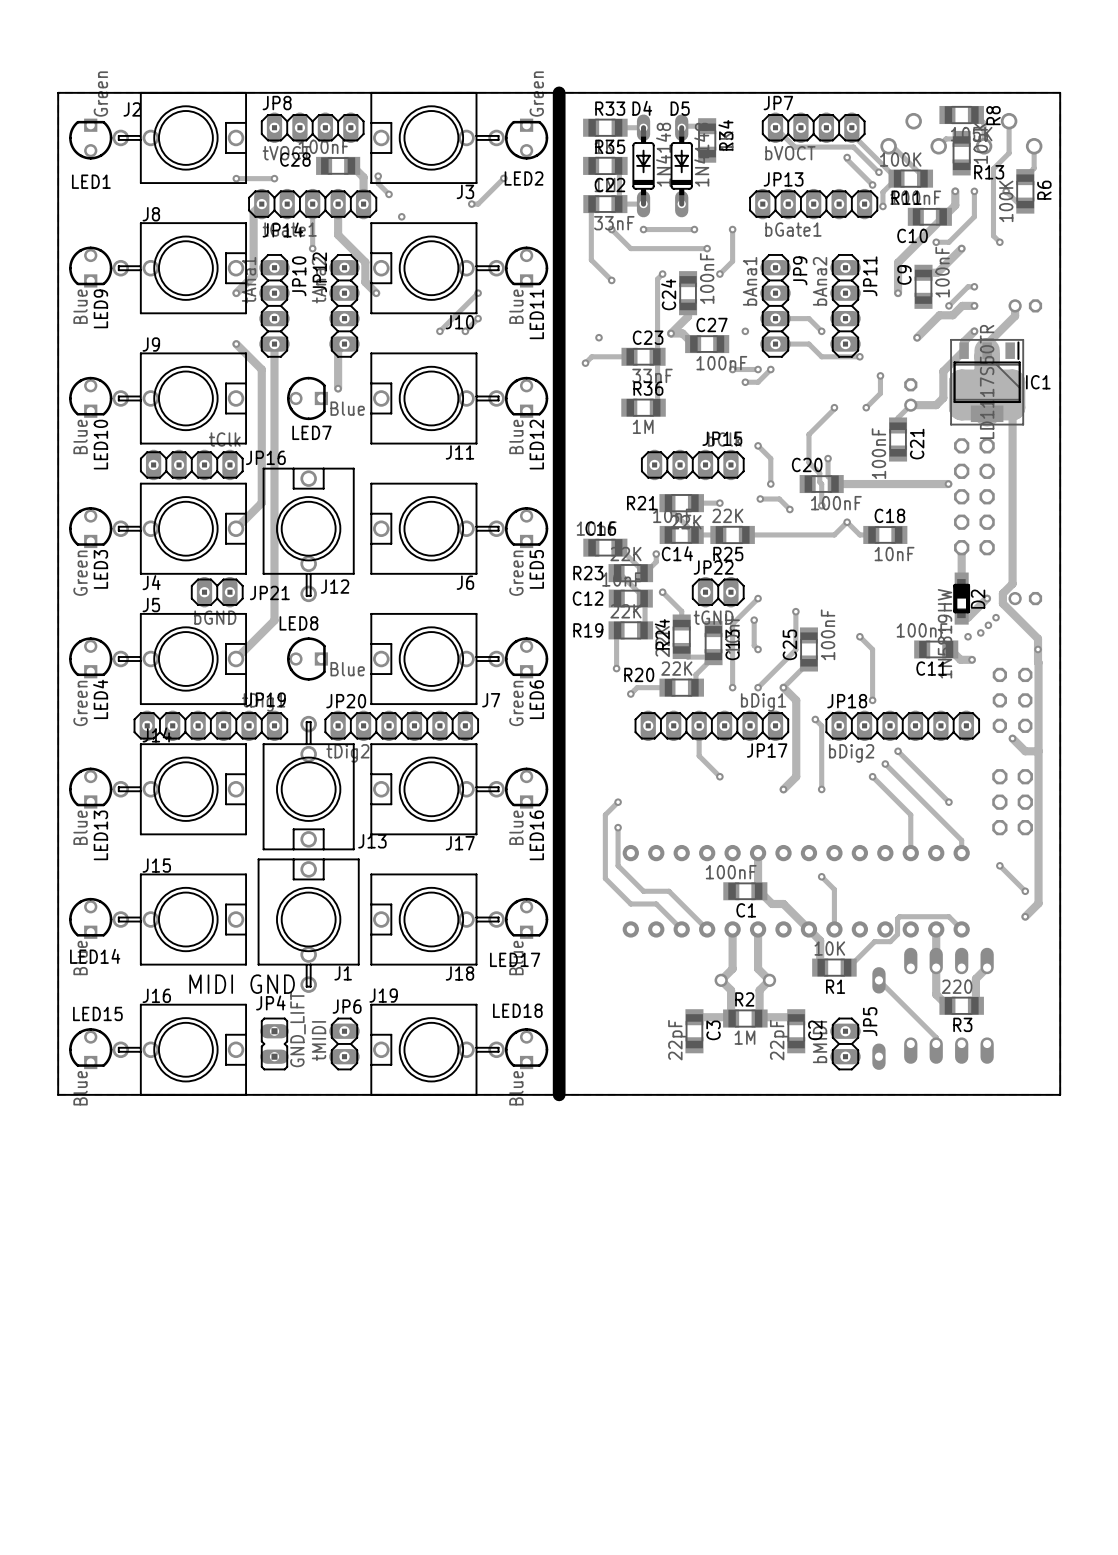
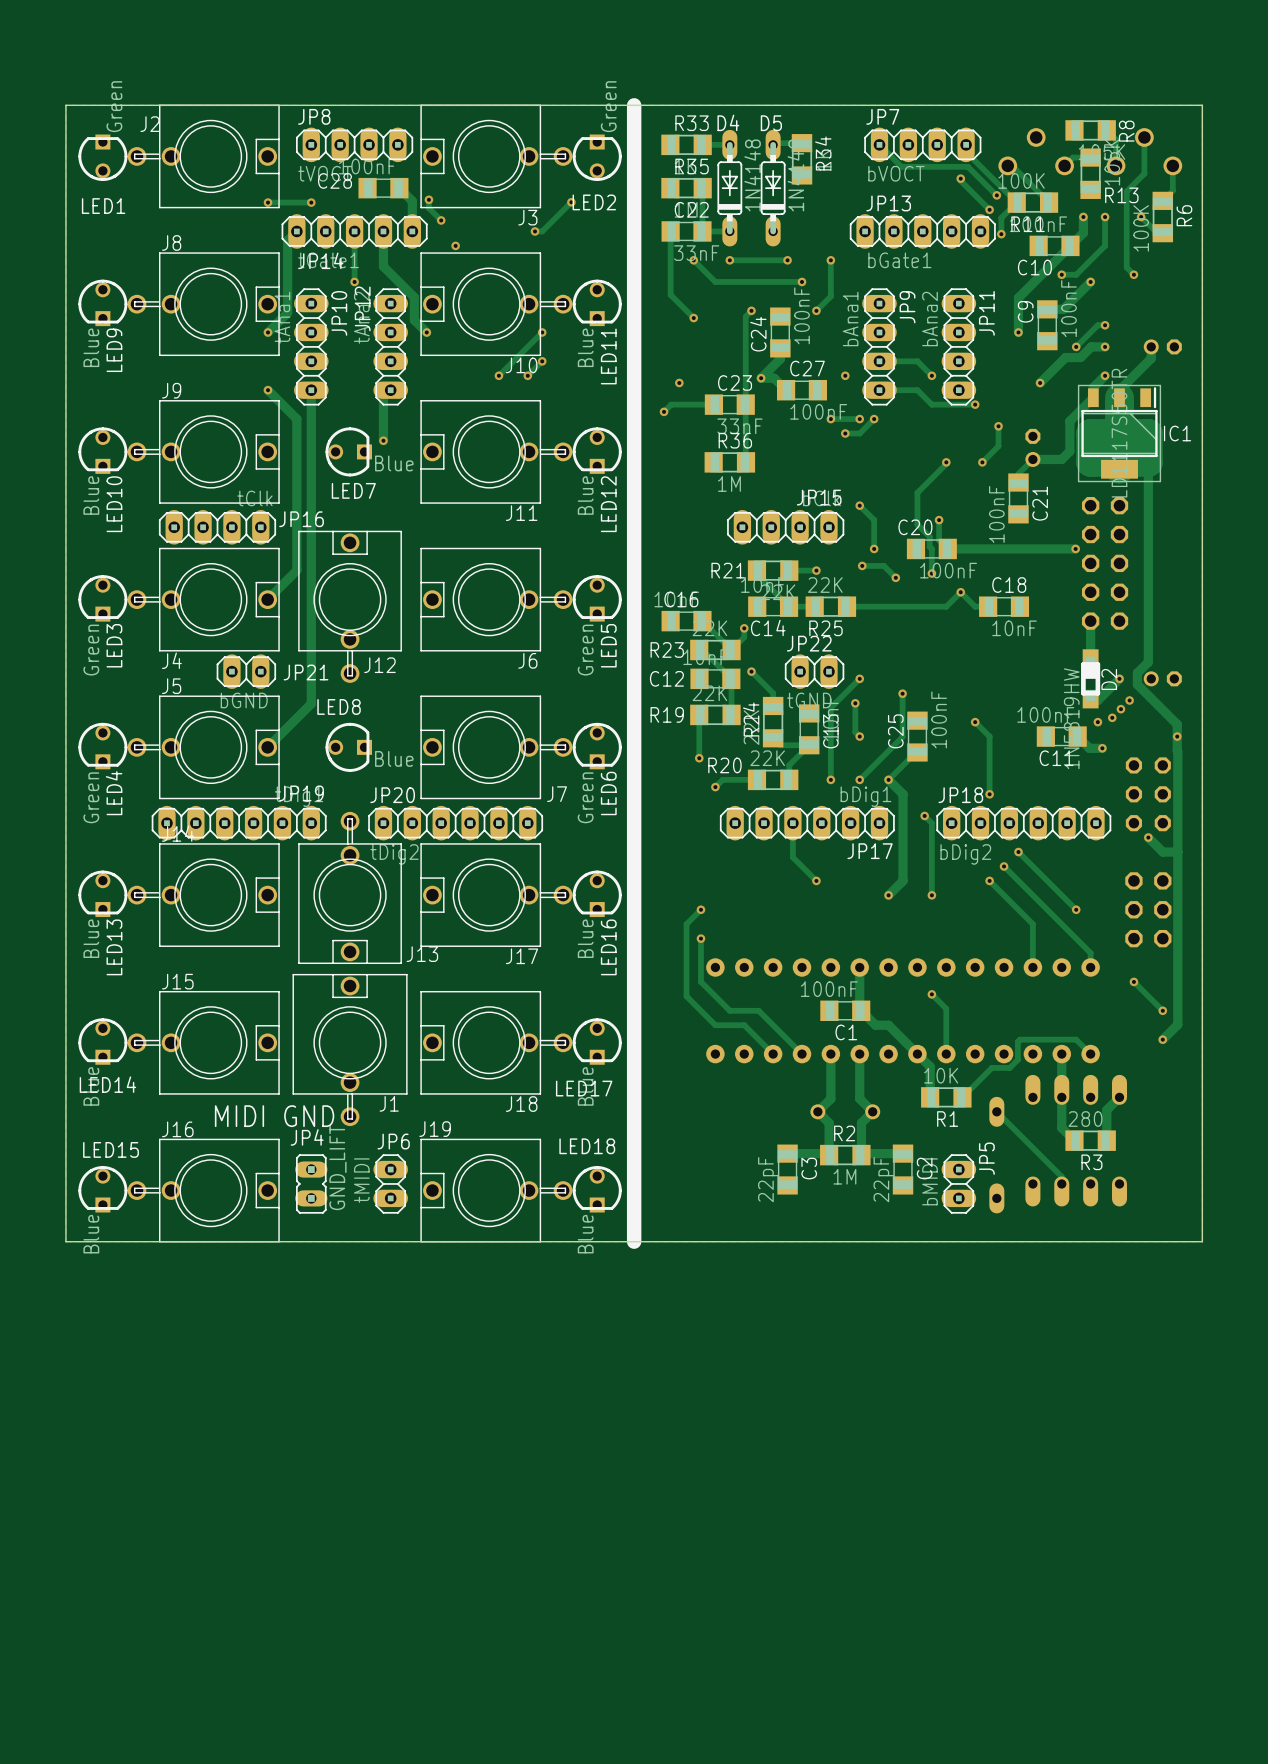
R3 value: 220 (957, 986) -> 280 (1085, 1119)

